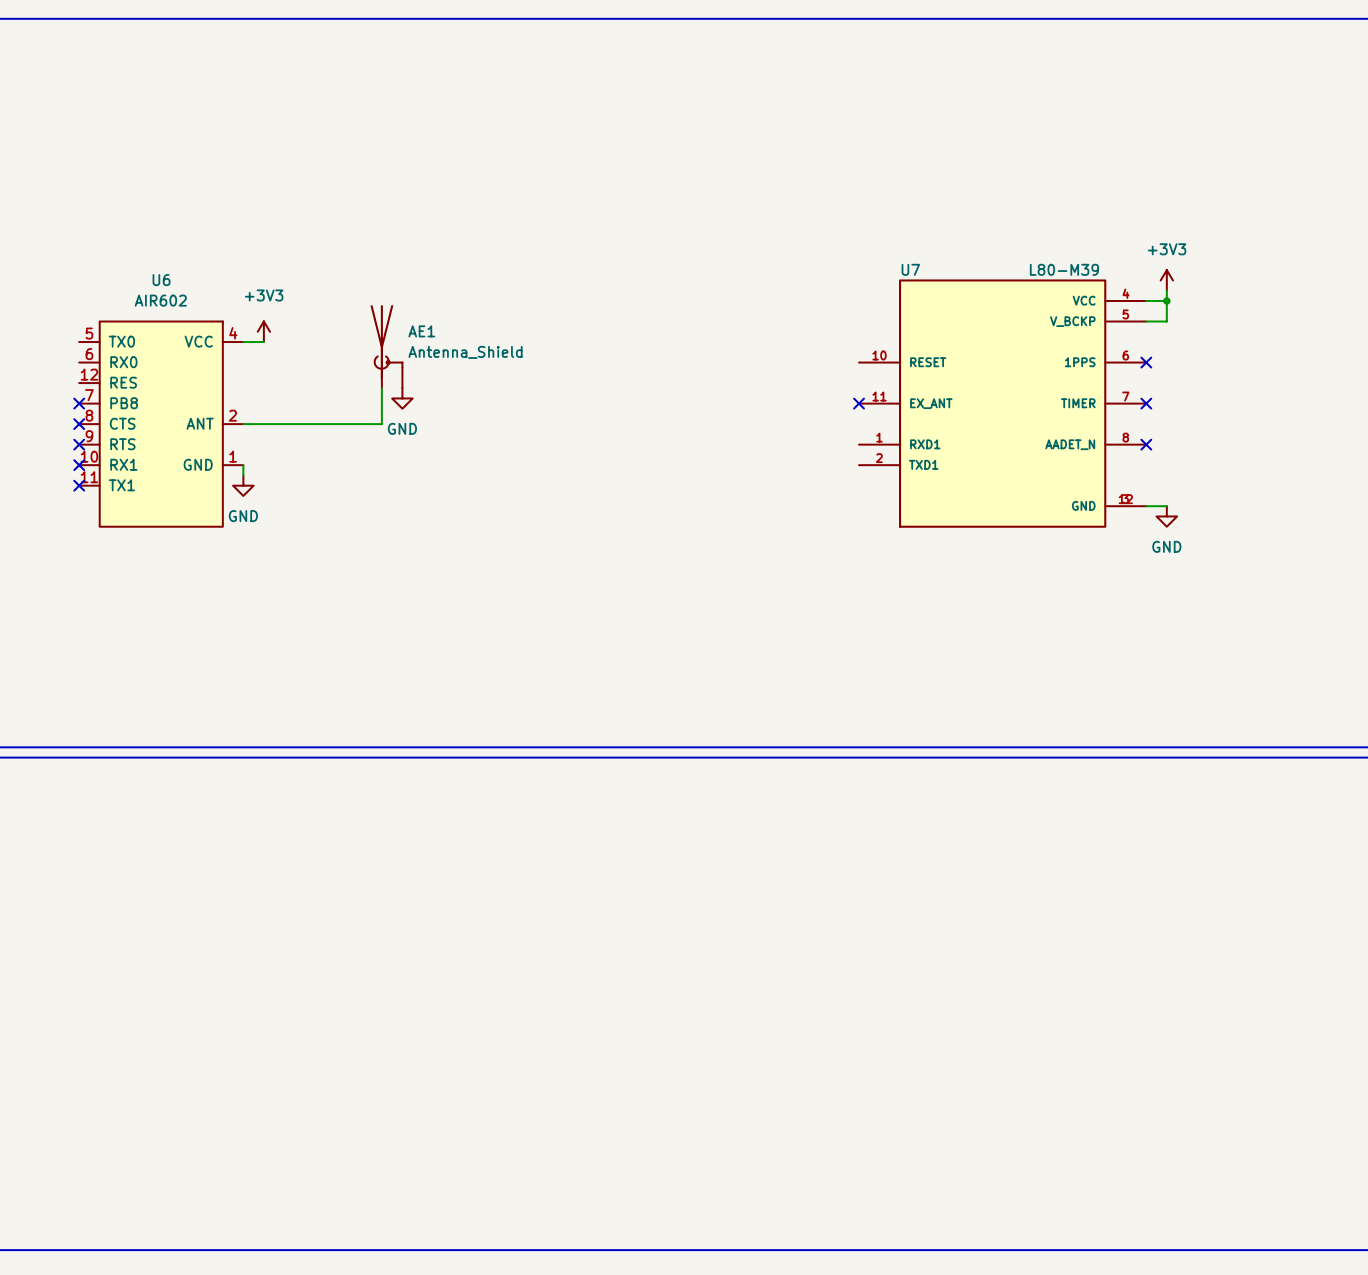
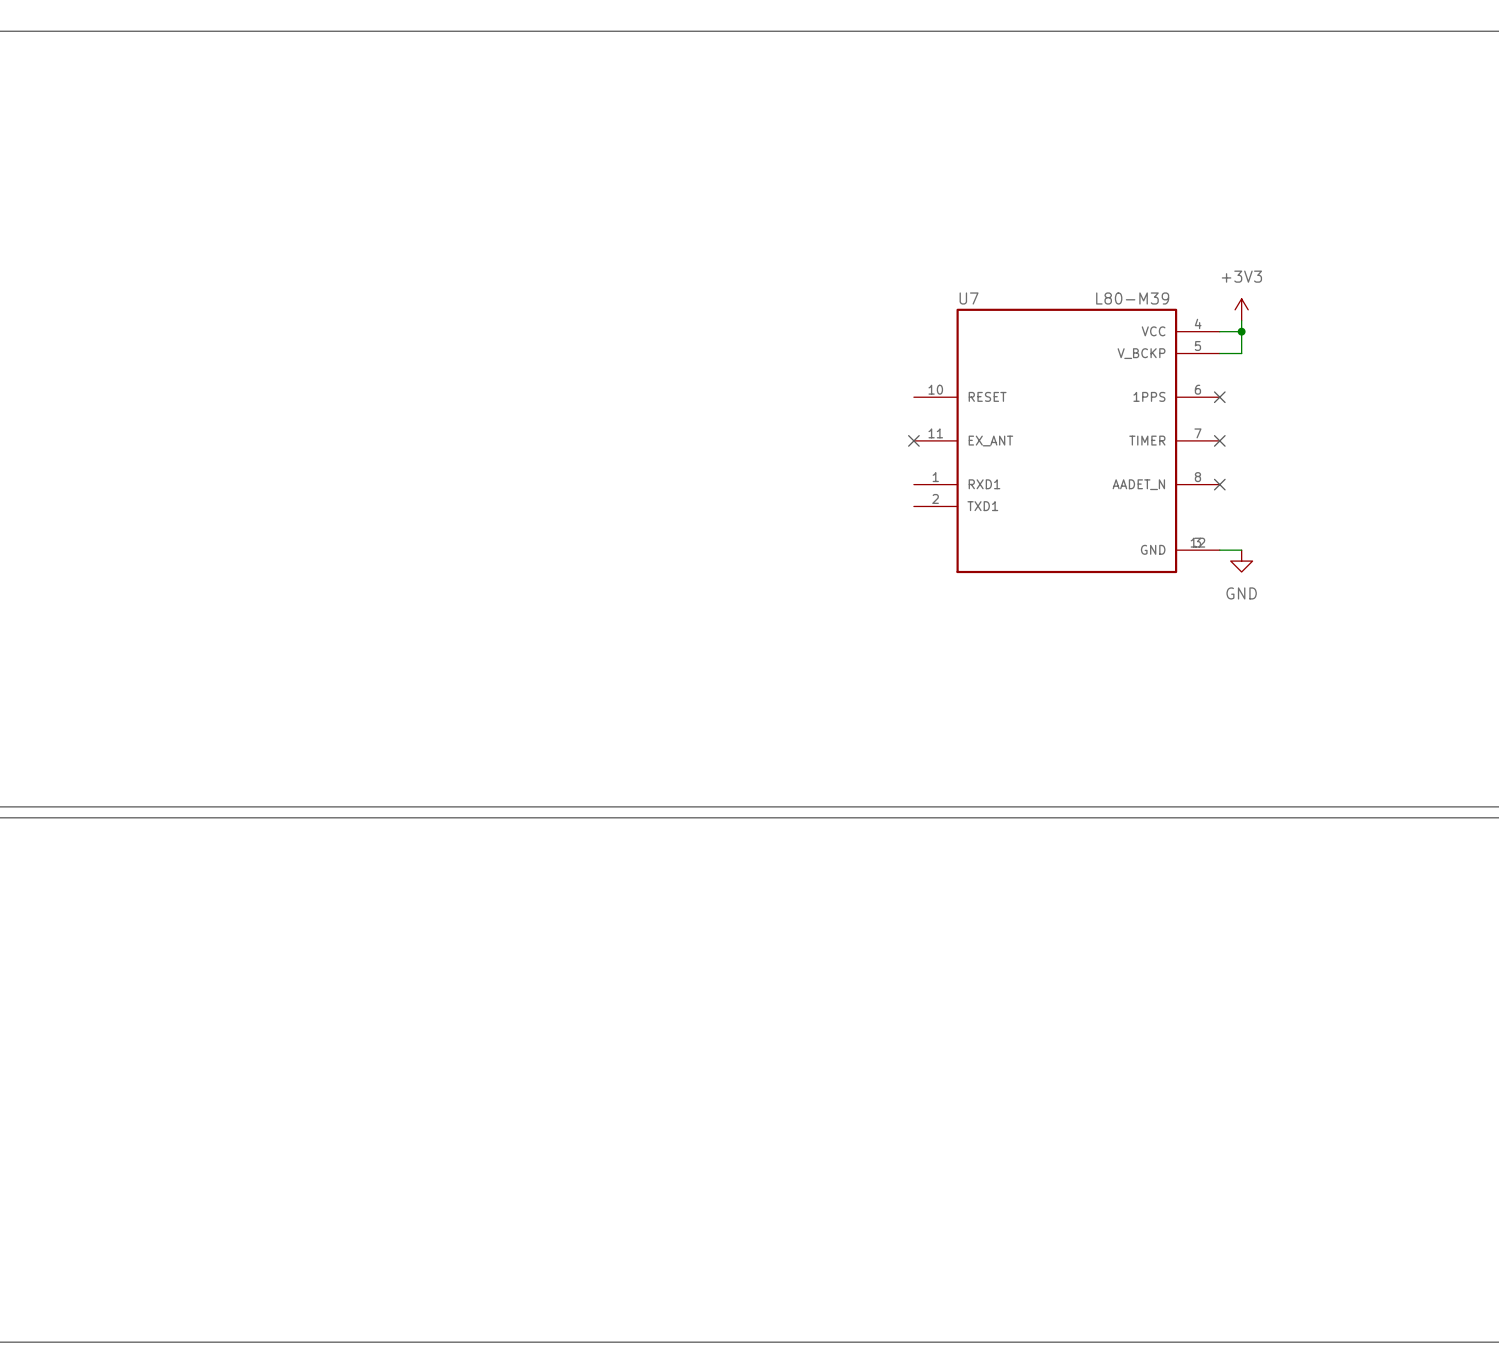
power symbol: +3V3 (263, 331) -> none
wire: (243, 342) (263, 342) -> none
AE1: Antenna_Shield (386, 346) -> none
wire: (381, 388) (381, 424) (243, 424) -> none
power symbol: GND (402, 398) -> none
no-connect mark: (79, 403) -> none
no-connect mark: (79, 424) -> none
U6: AIR602 (161, 424) -> none
no-connect mark: (79, 444) -> none
no-connect mark: (79, 465) -> none
wire: (243, 465) (243, 475) -> none
no-connect mark: (79, 485) -> none
power symbol: GND (243, 485) -> none

